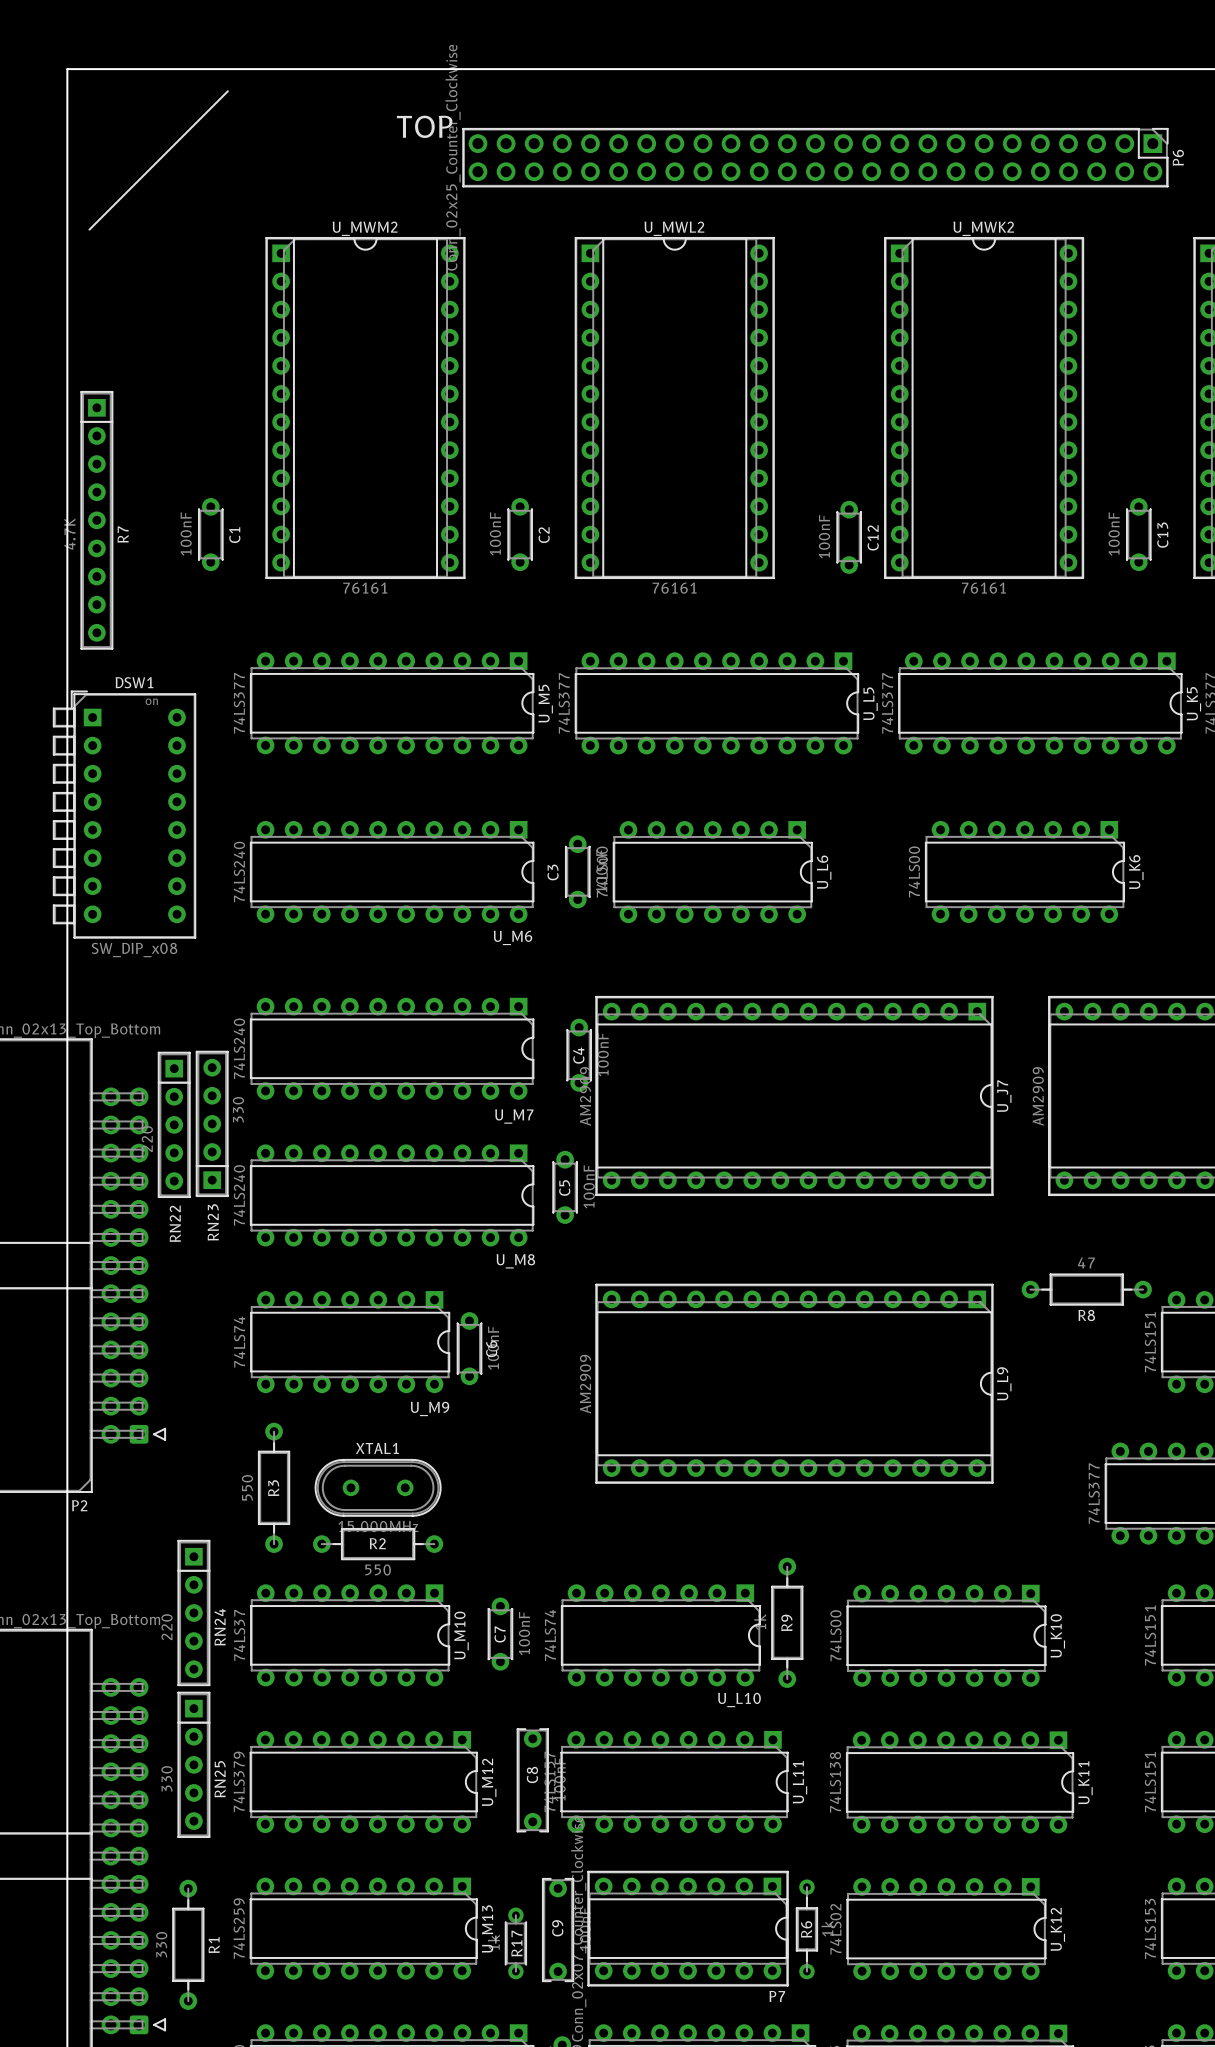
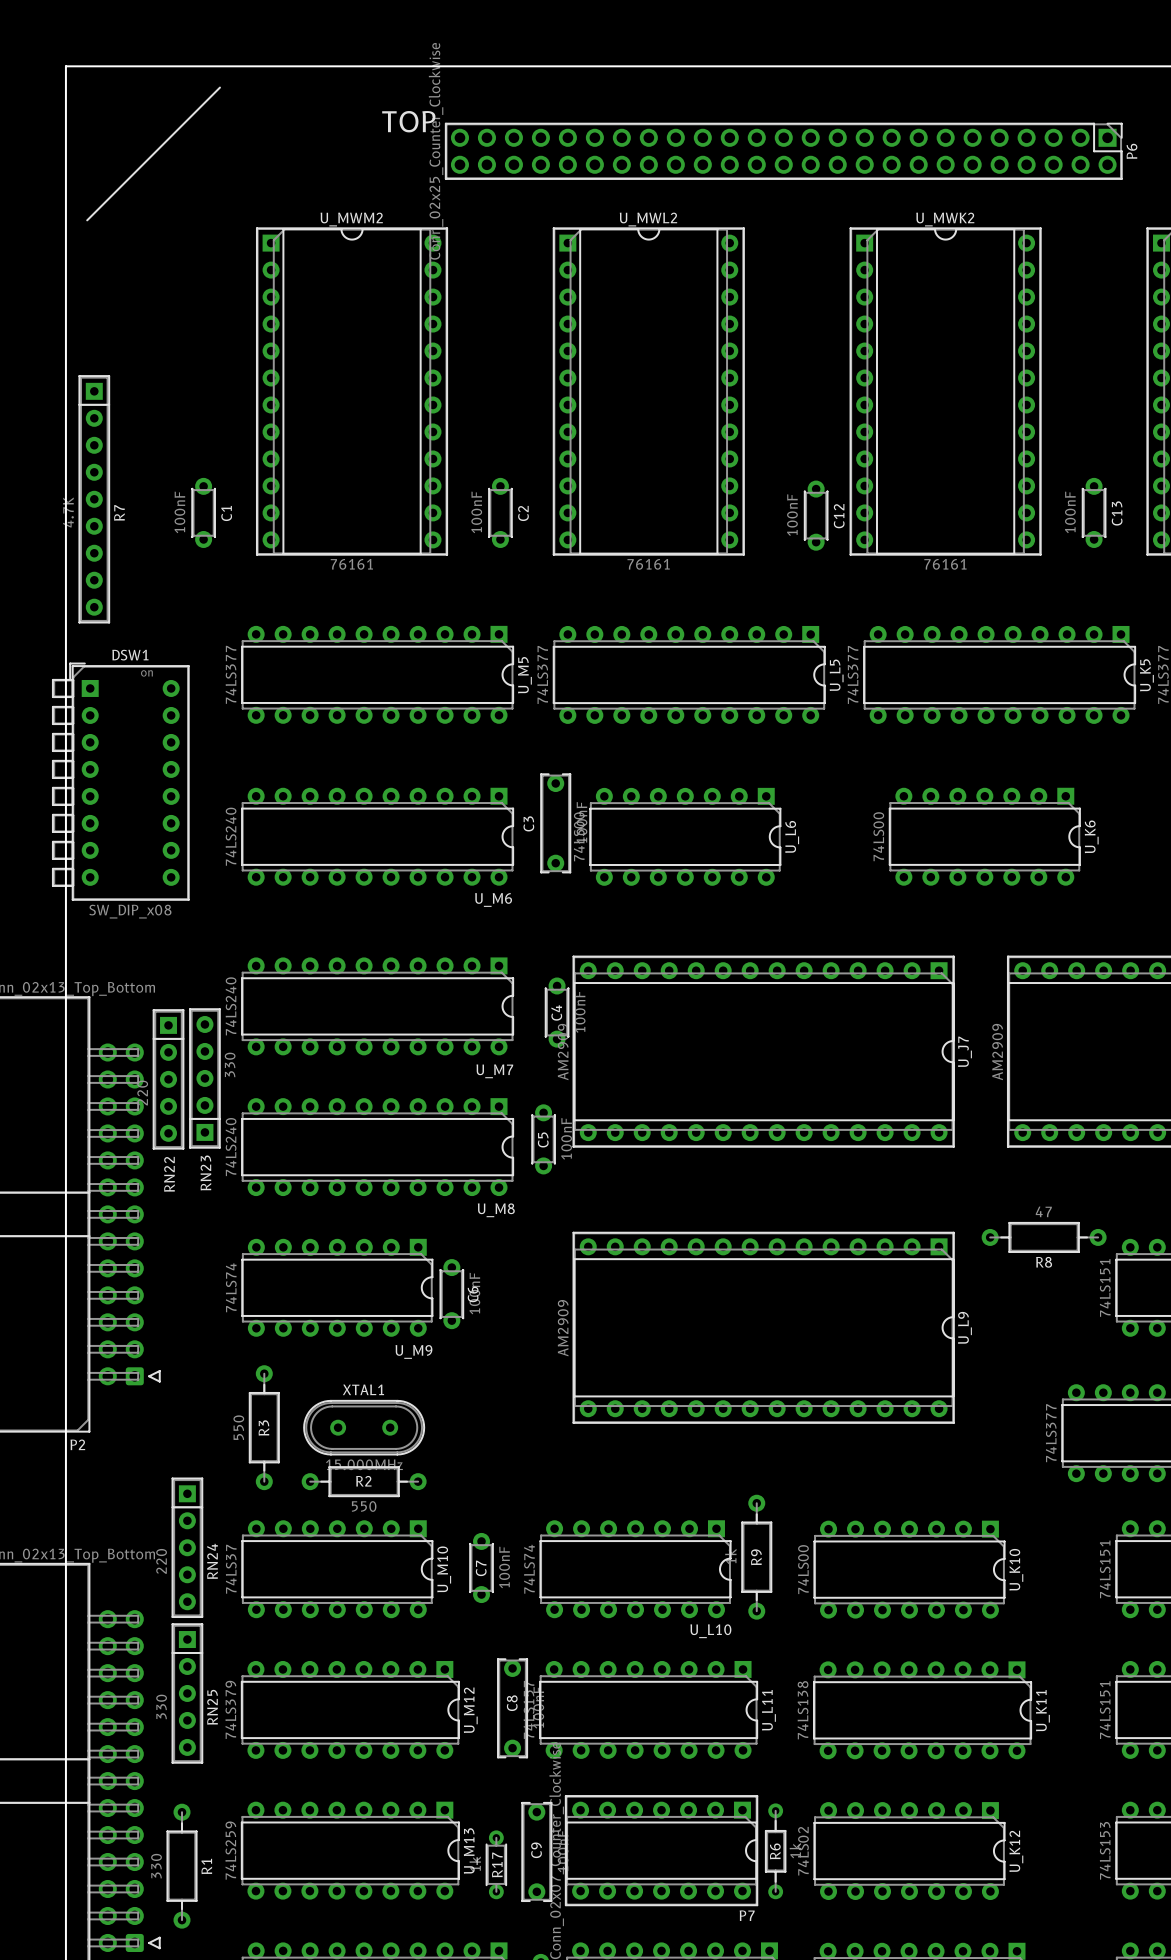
C3 footprint: [565, 835, 591, 909] -> [540, 773, 571, 874]

